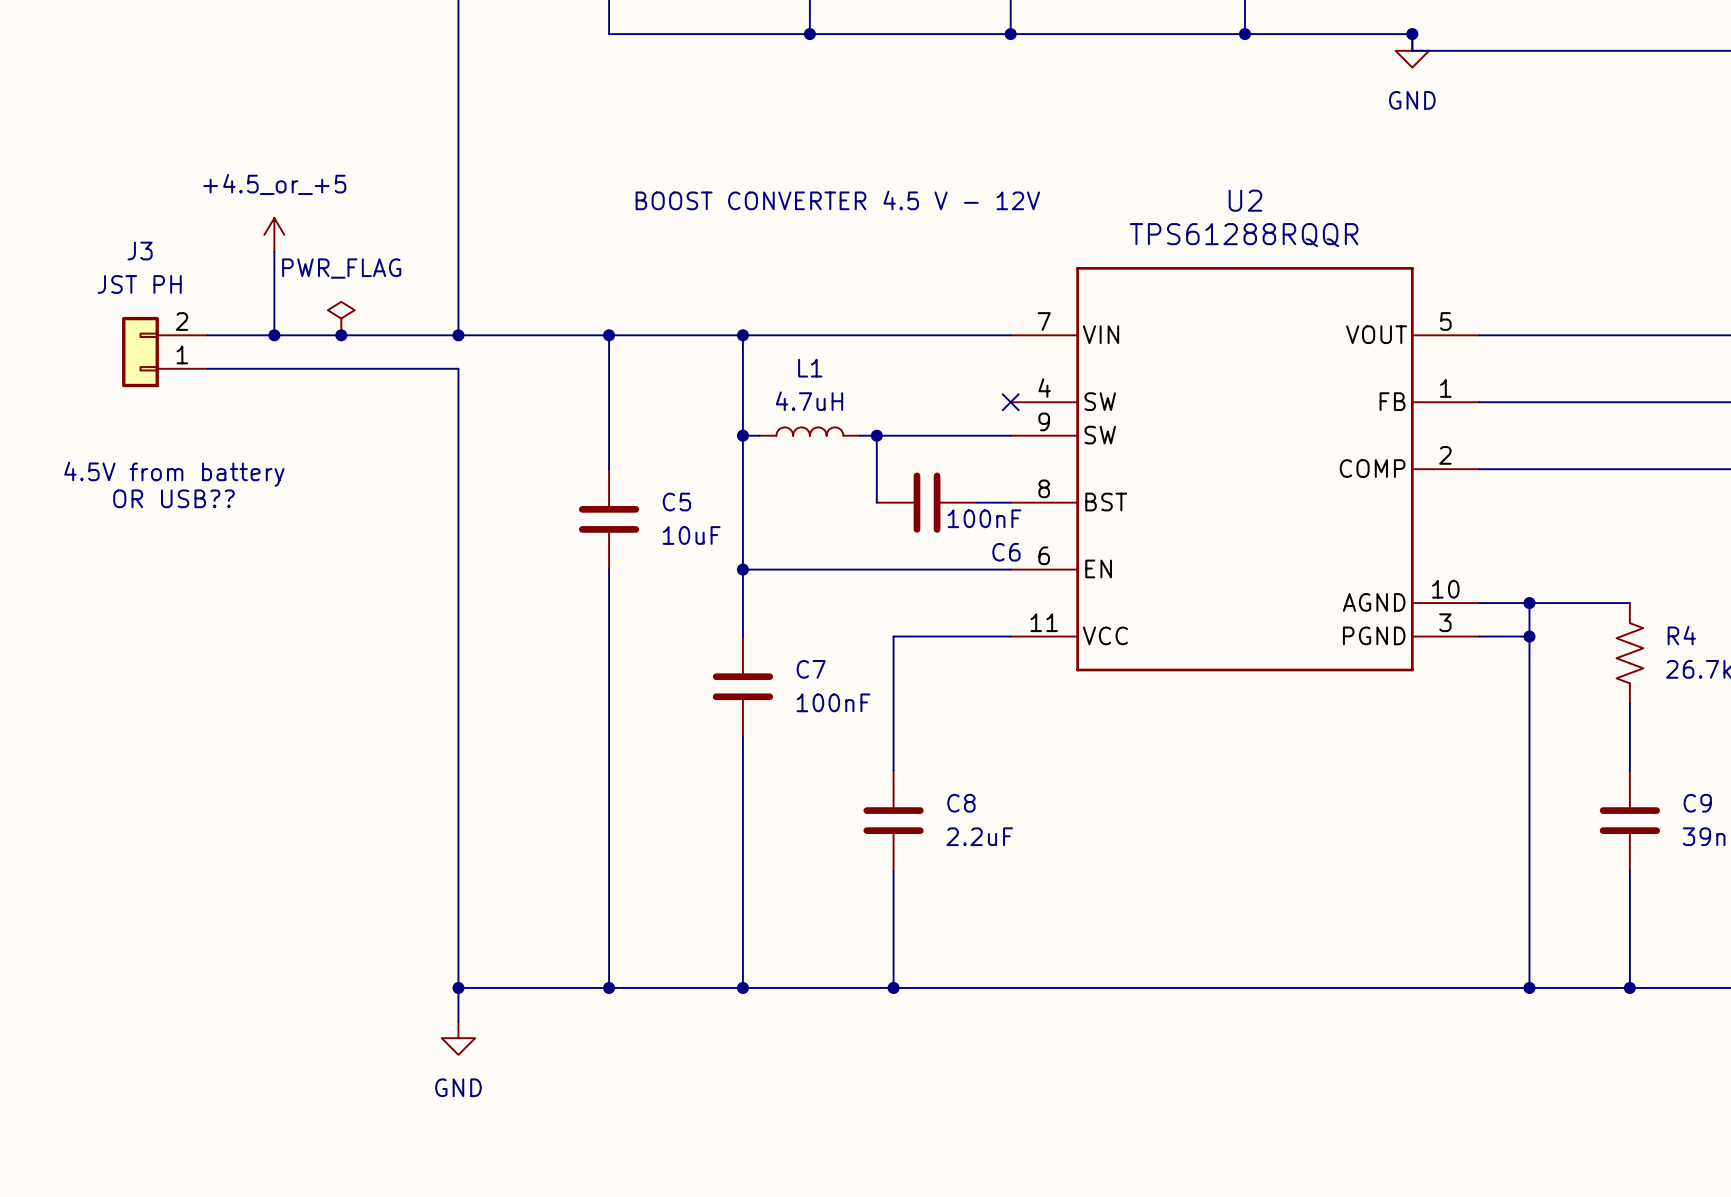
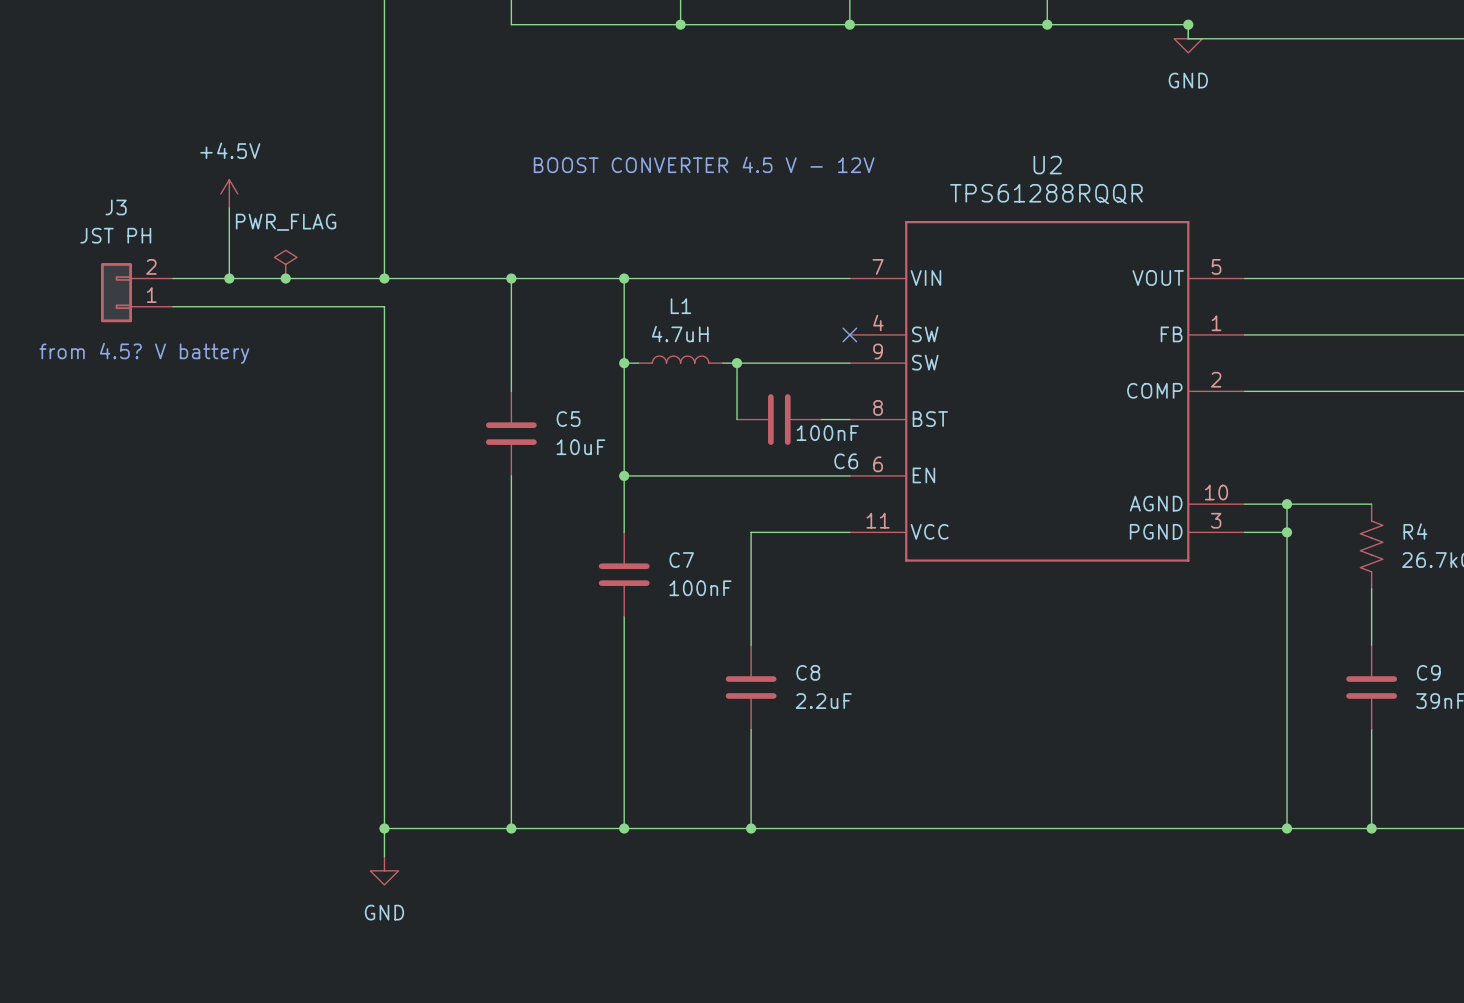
power symbol: +4.5_or_+5 (274, 234) -> +4.5V (229, 193)
text: none -> from 4.5? V battery (144, 353)
text: 4.5V from battery (174, 474) -> none
text: OR USB?? (173, 498) -> none

